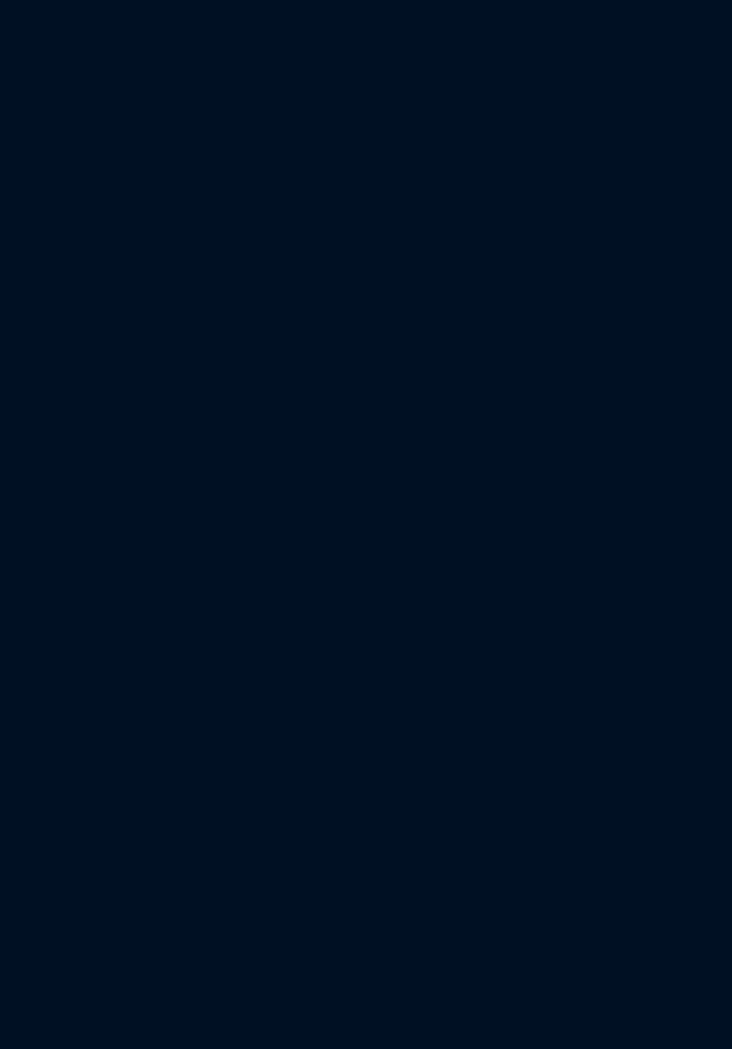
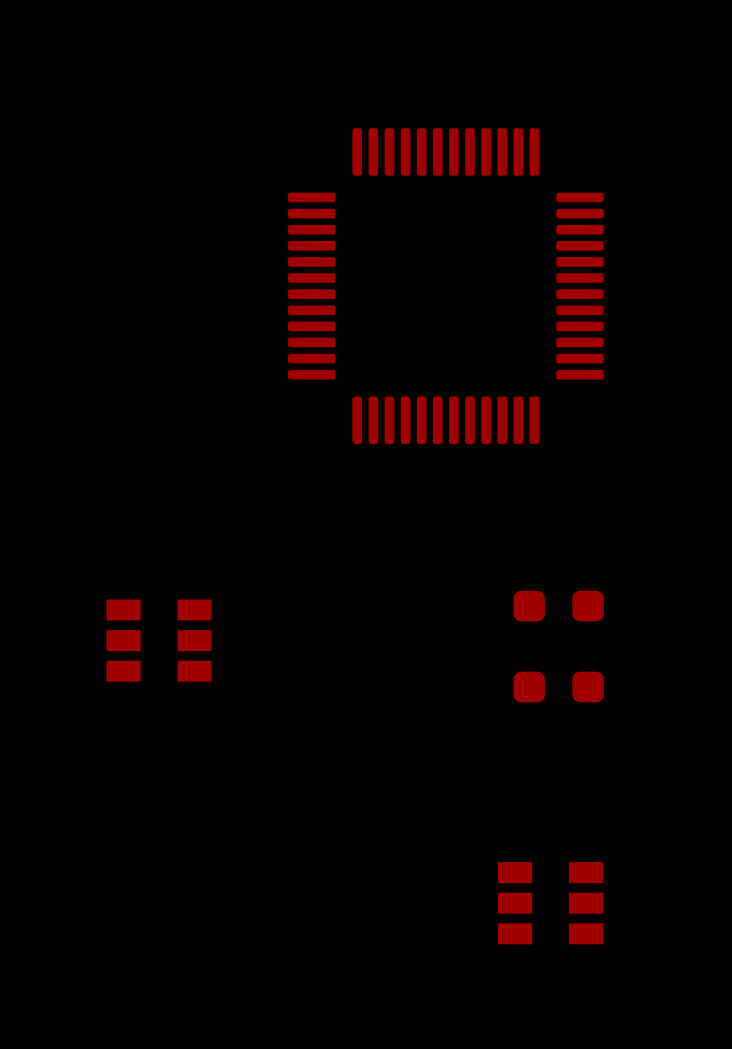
part: none -> (445, 286)
part: none -> (558, 606)
part: none -> (159, 640)
part: none -> (558, 686)
part: none -> (550, 903)

